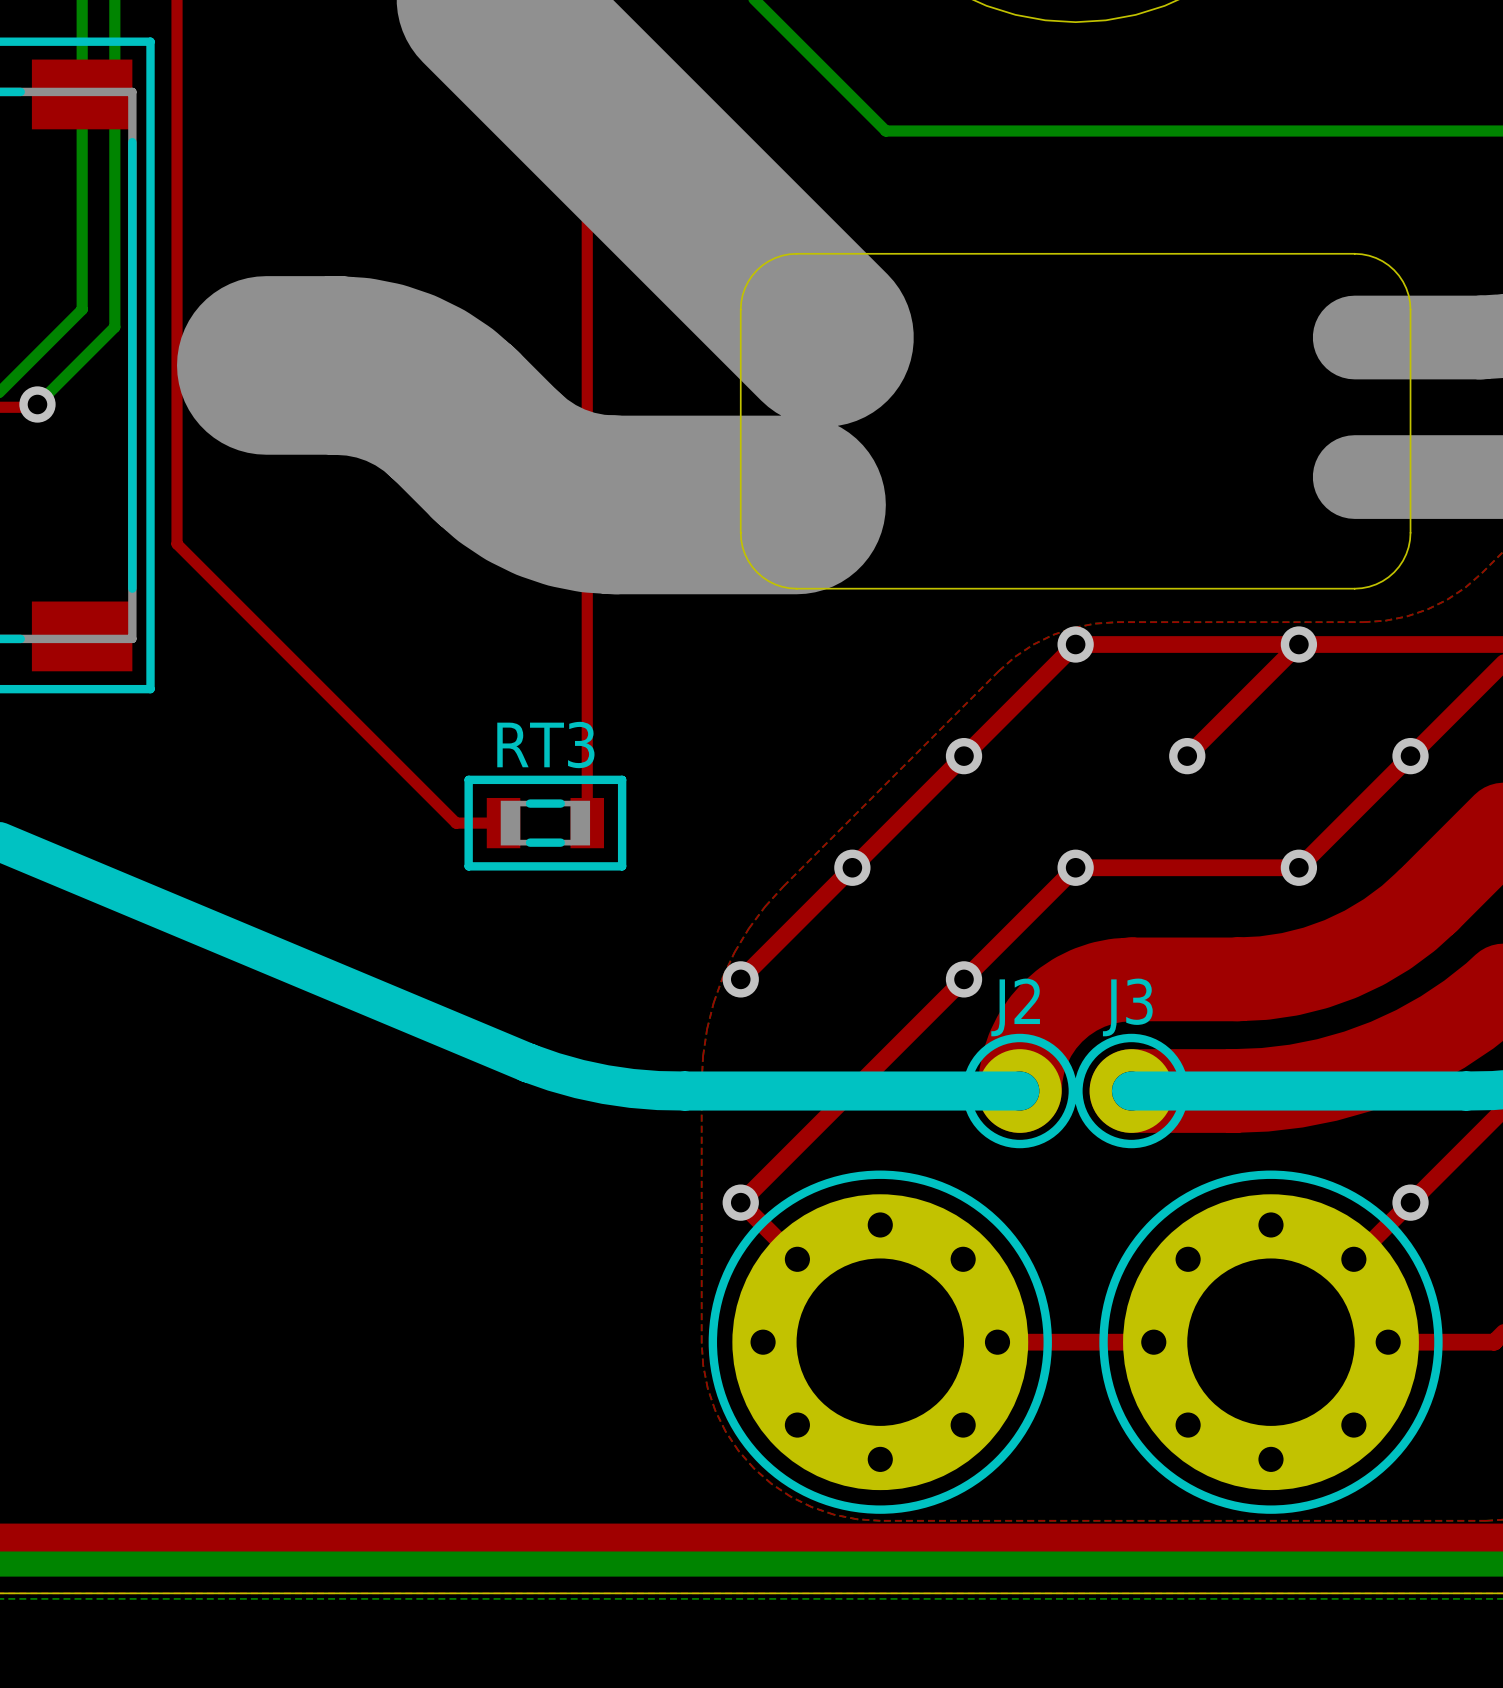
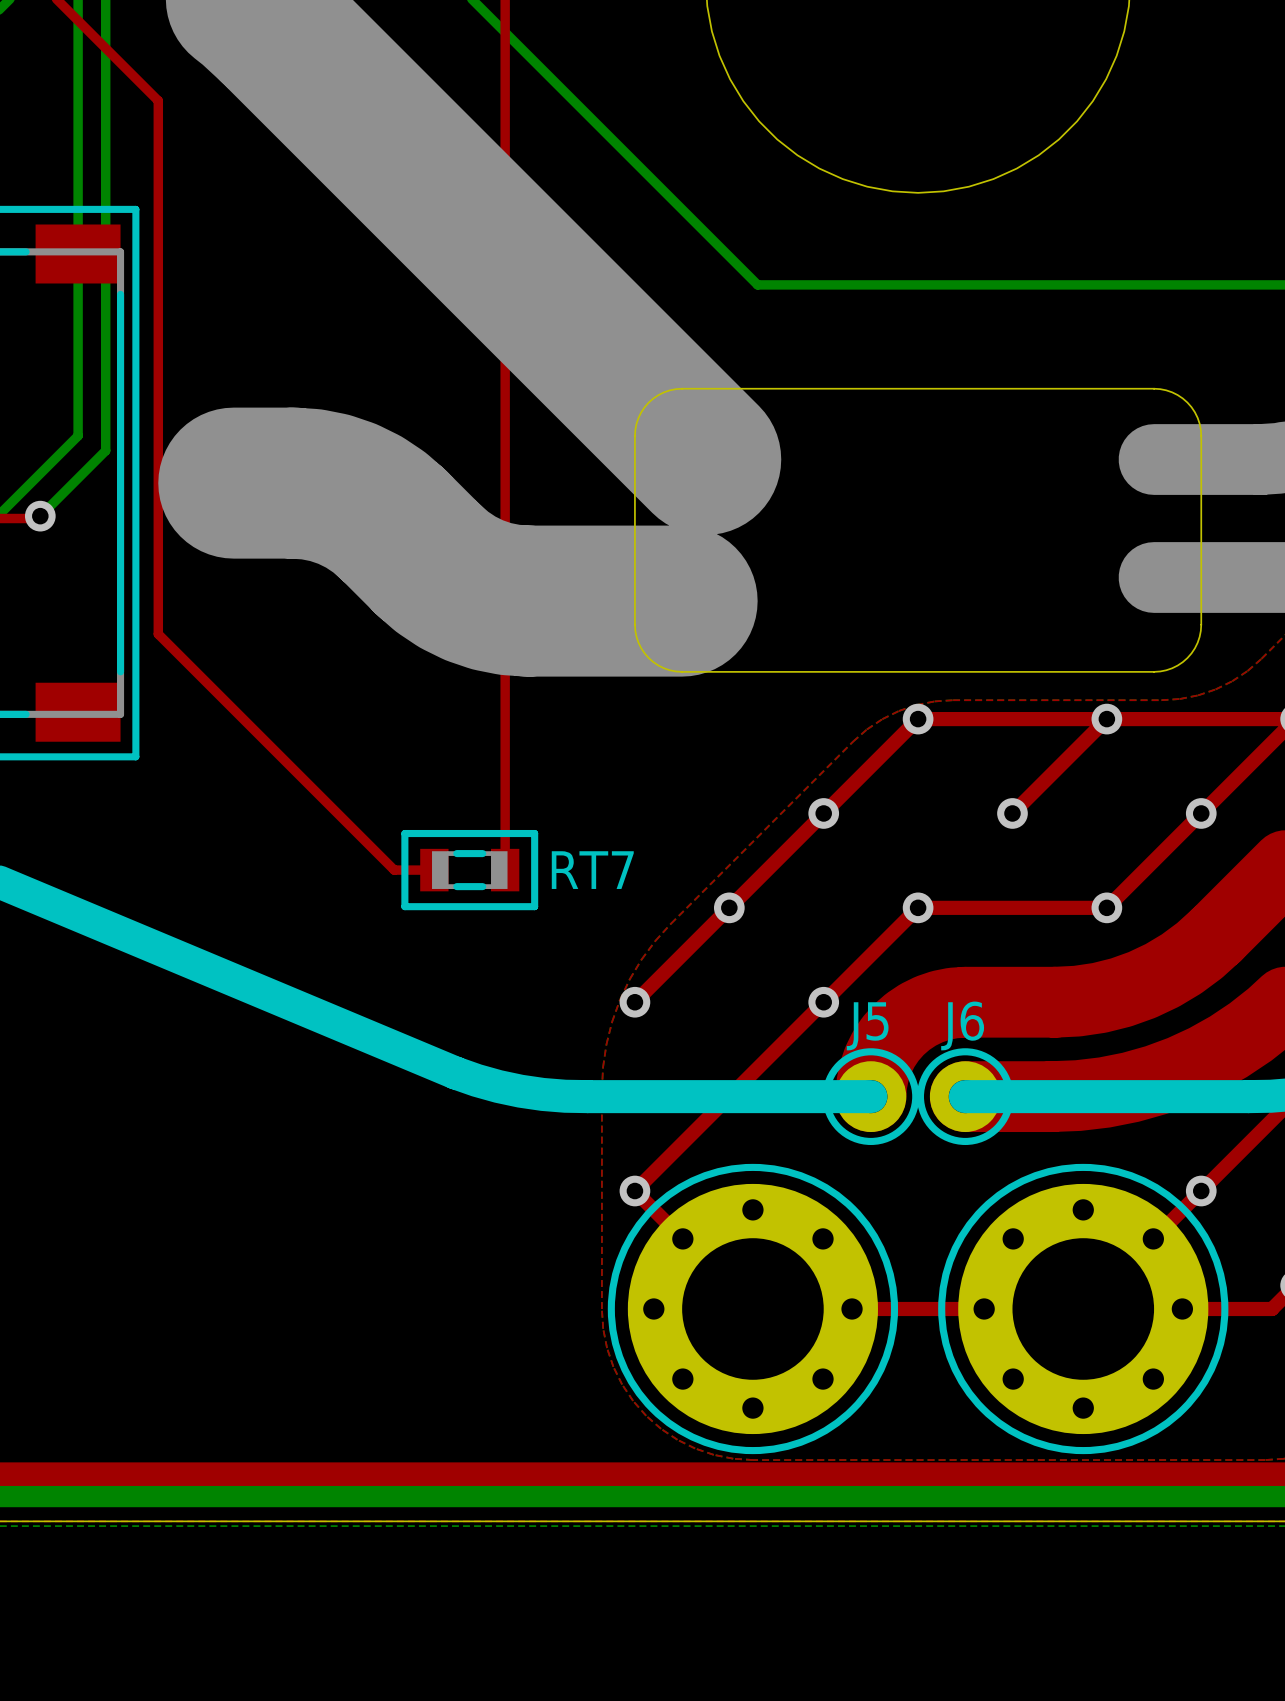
RT3 name: RT3 (545, 745) -> RT7 (592, 870)
J2 name: J2 (1015, 1007) -> J5 (867, 1026)
J3 name: J3 (1127, 1007) -> J6 (962, 1025)

